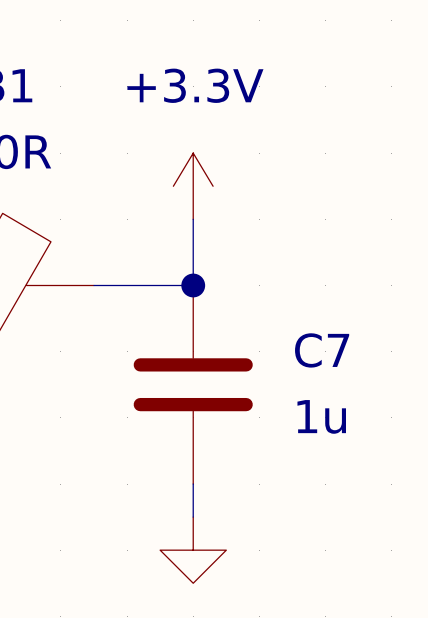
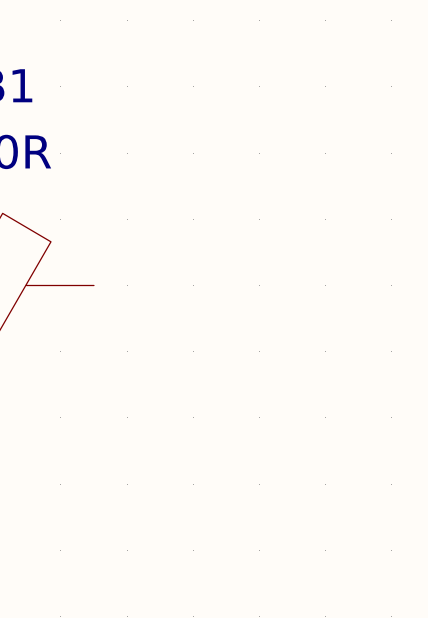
power symbol: +3.3V (193, 186) -> none
wire: (193, 219) (193, 285) (93, 285) -> none
junction: (193, 285) -> none
C7: 1u (193, 384) -> none
wire: (193, 484) (193, 517) -> none
power symbol: (193, 550) -> none

